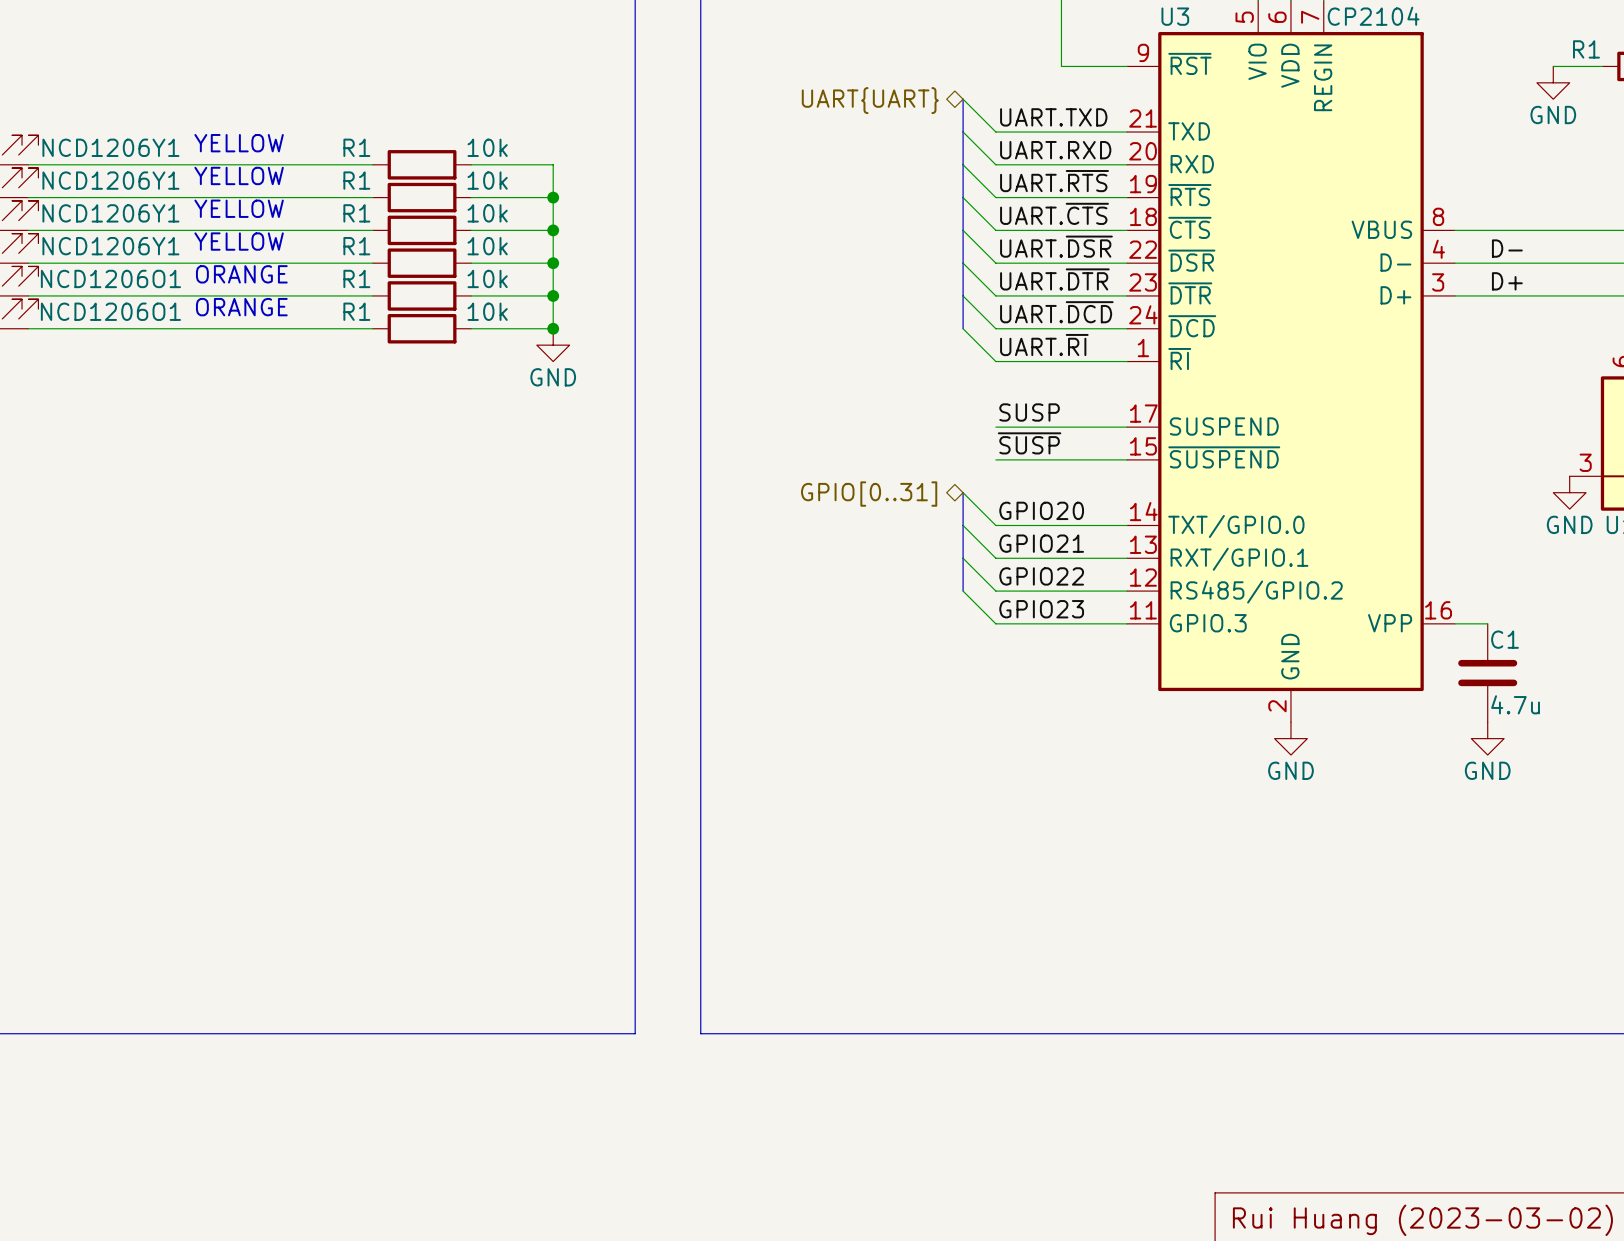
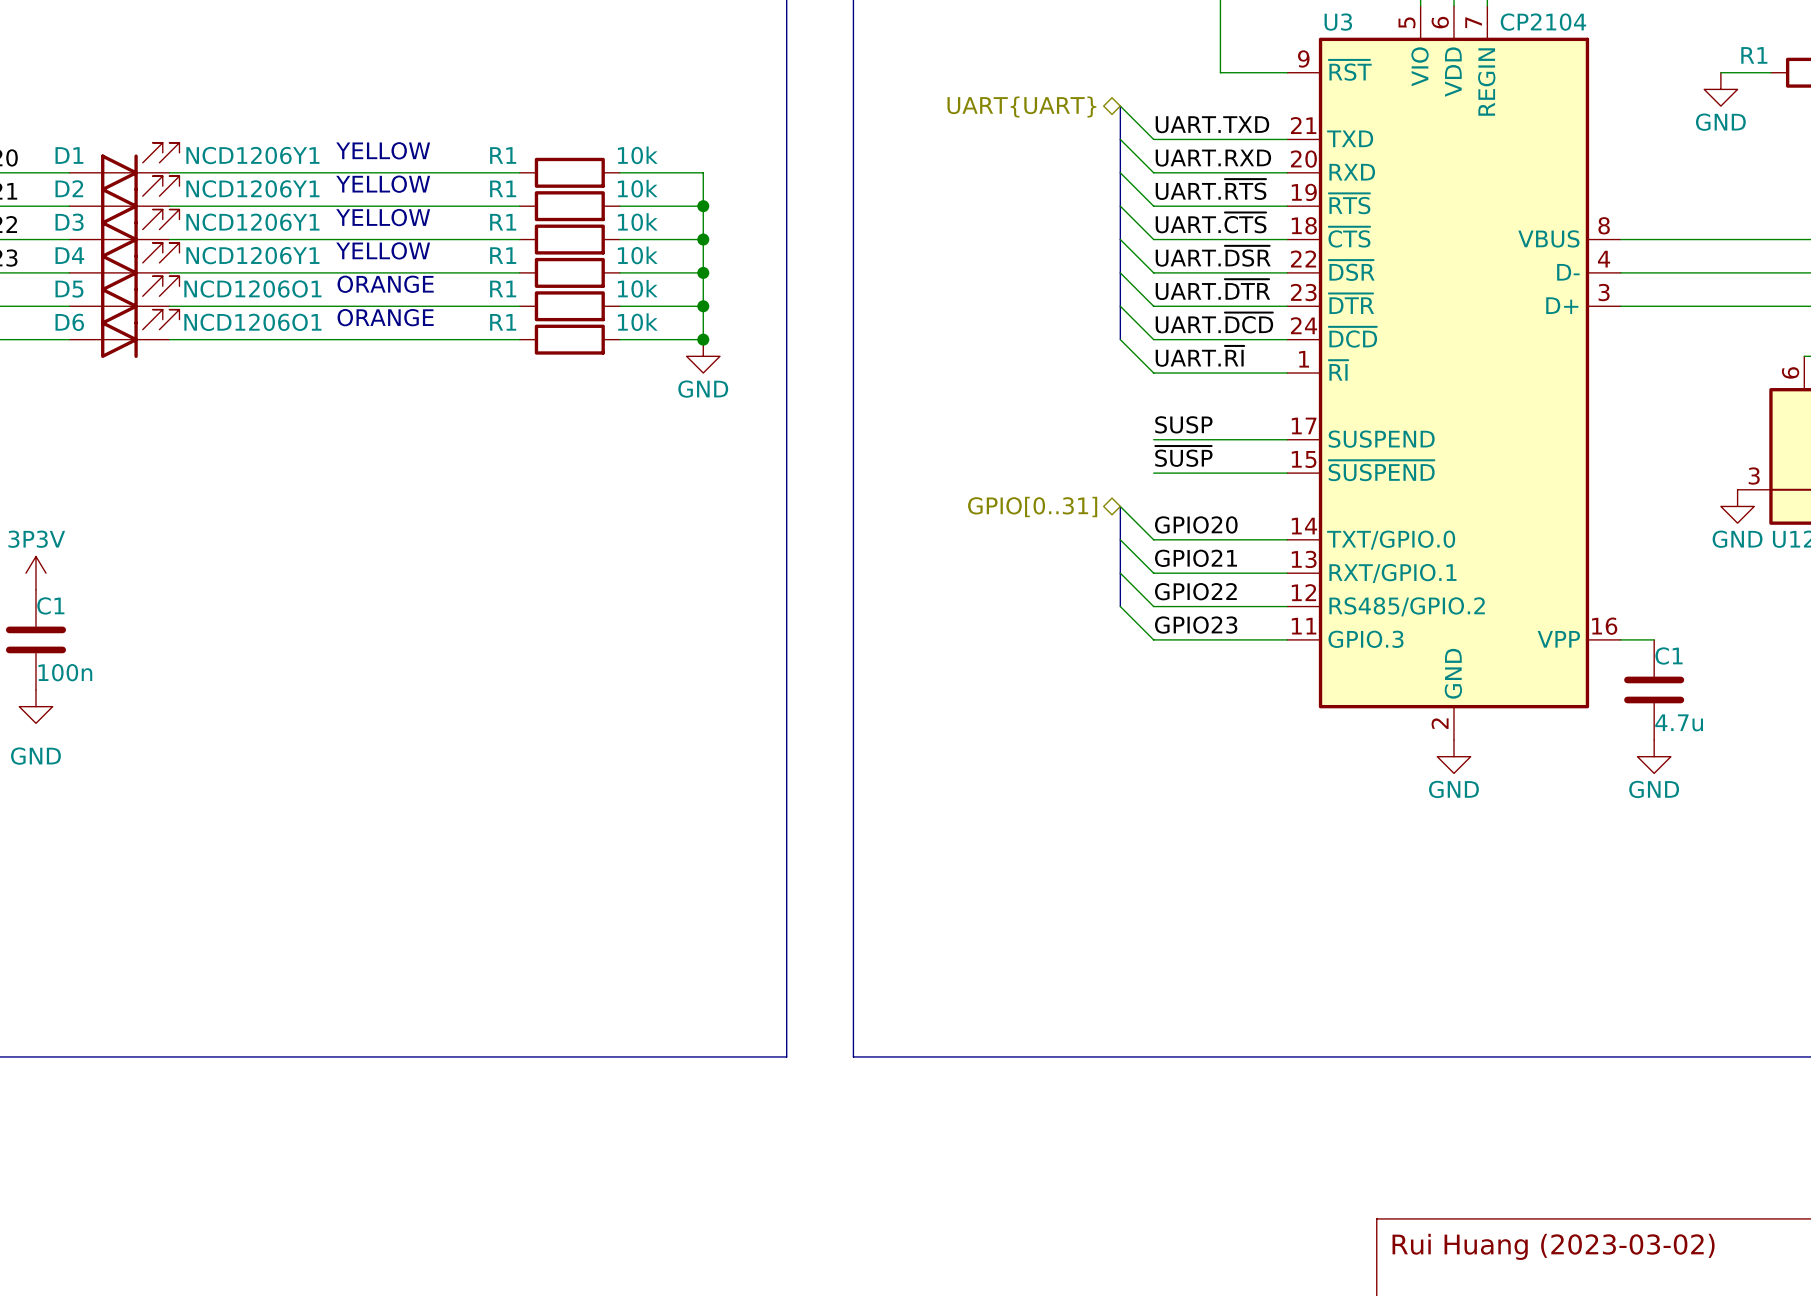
label: D- (1507, 248) -> none
label: D+ (1507, 281) -> none

